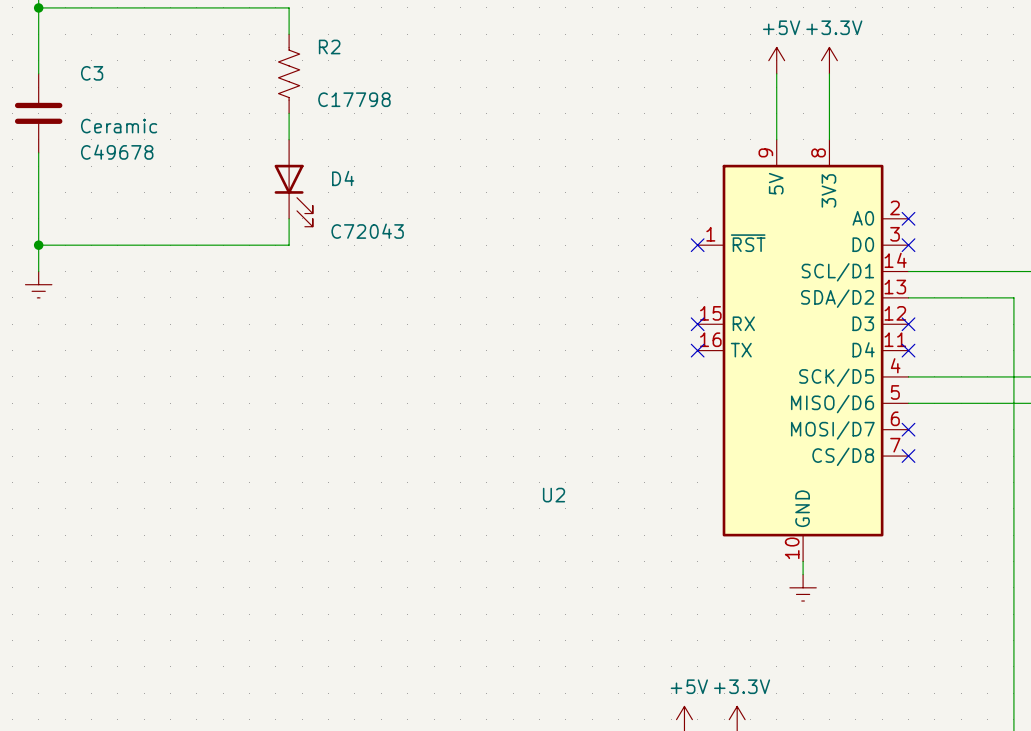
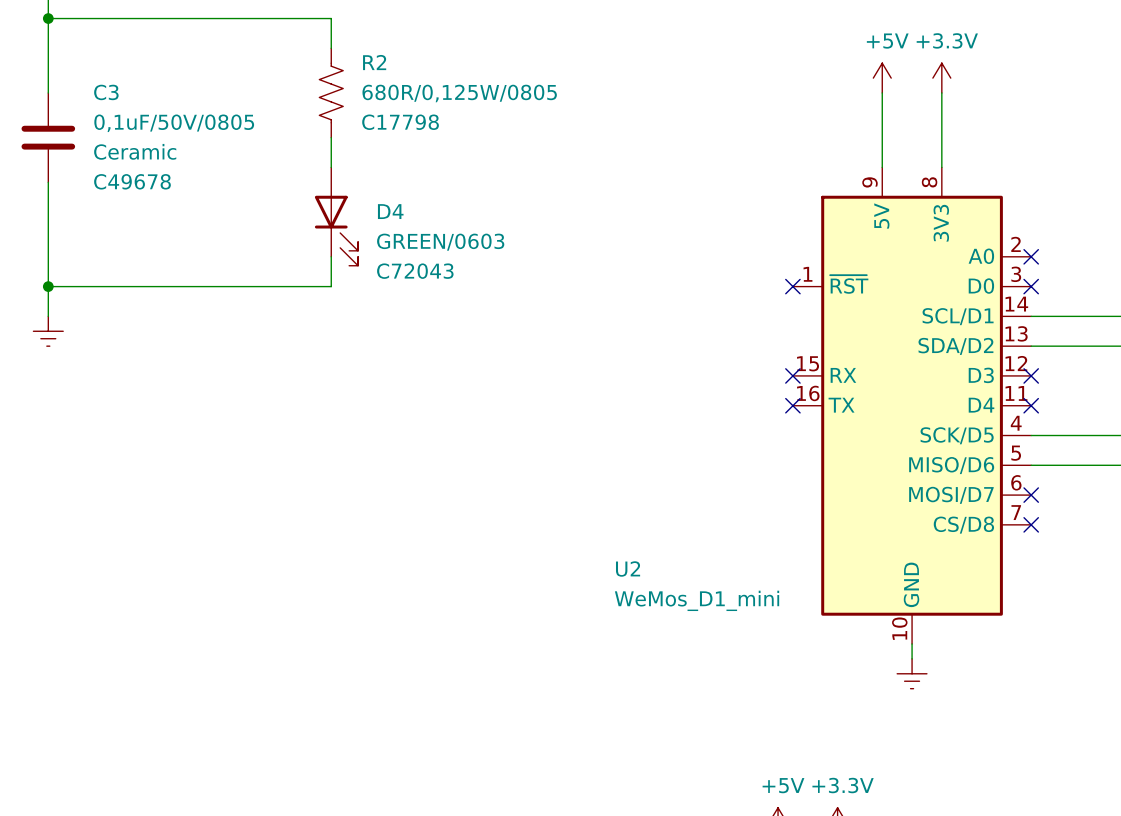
R2 value: none -> 680R/0,125W/0805 (459, 93)
C3 value: none -> 0,1uF/50V/0805 (174, 123)
D4 value: none -> GREEN/0603 (440, 242)
U2 value: none -> WeMos_D1_mini (697, 600)

